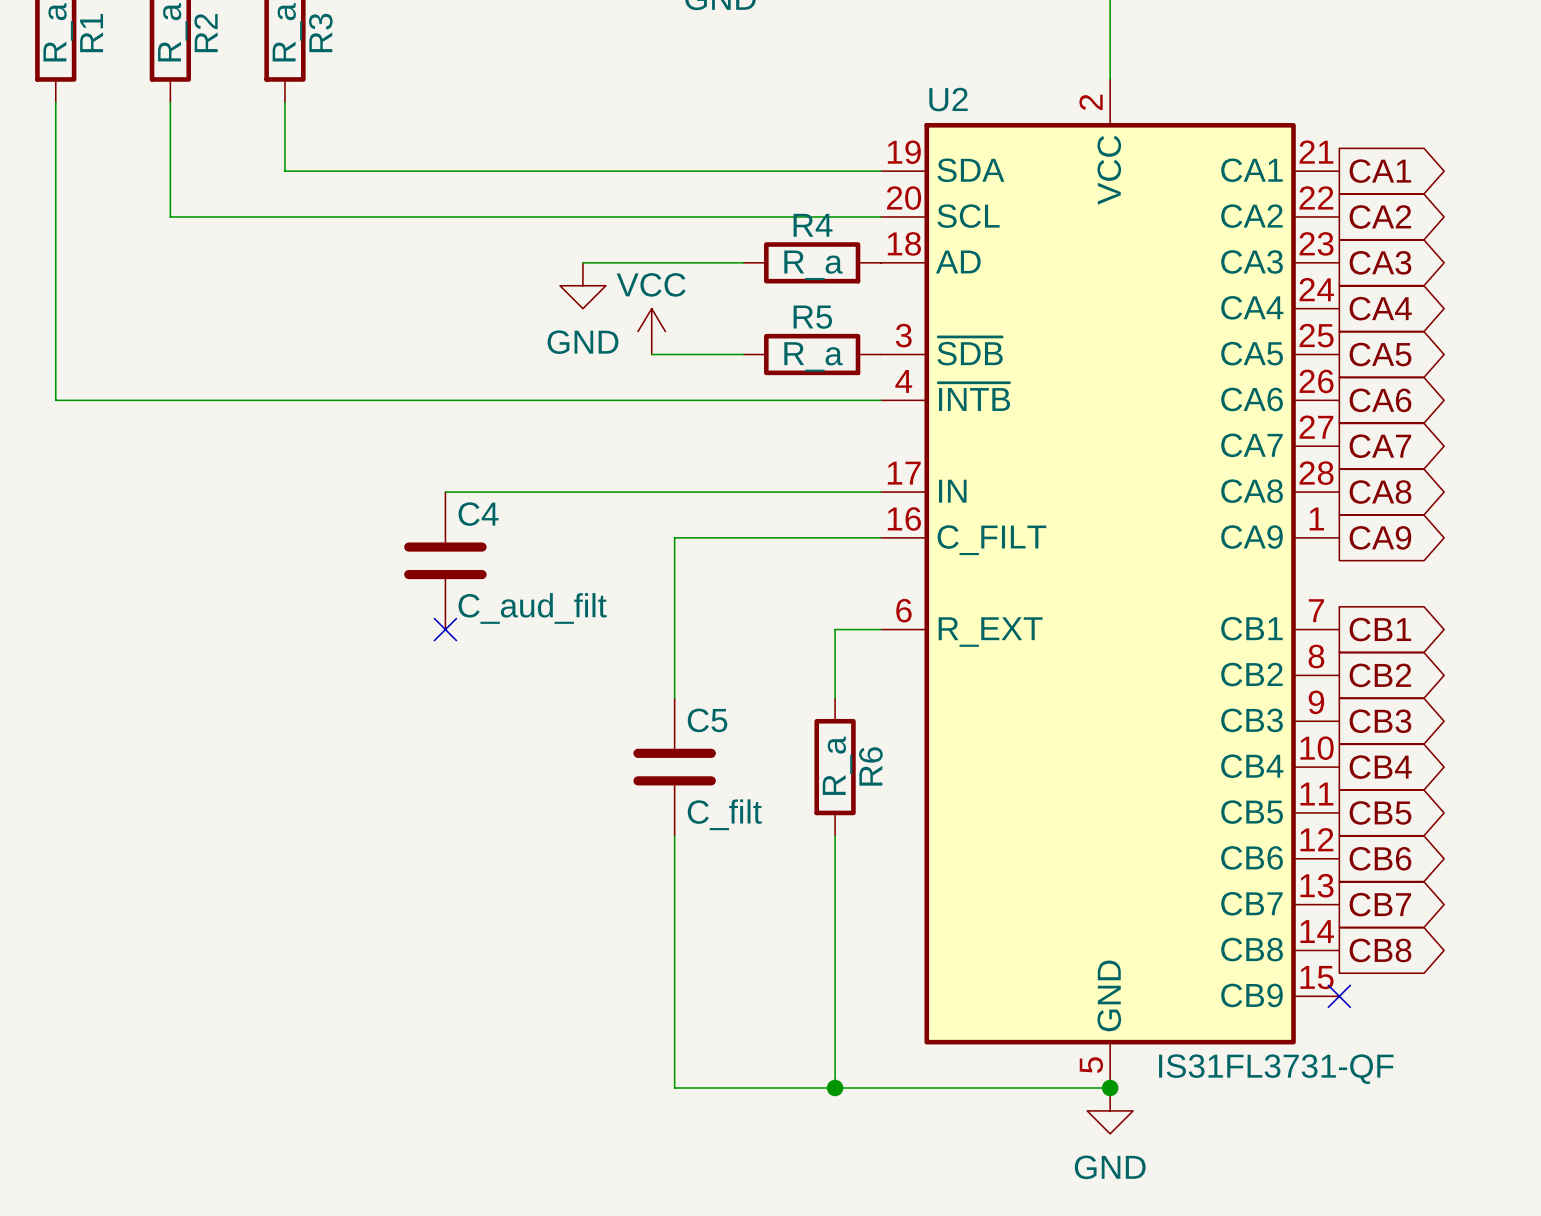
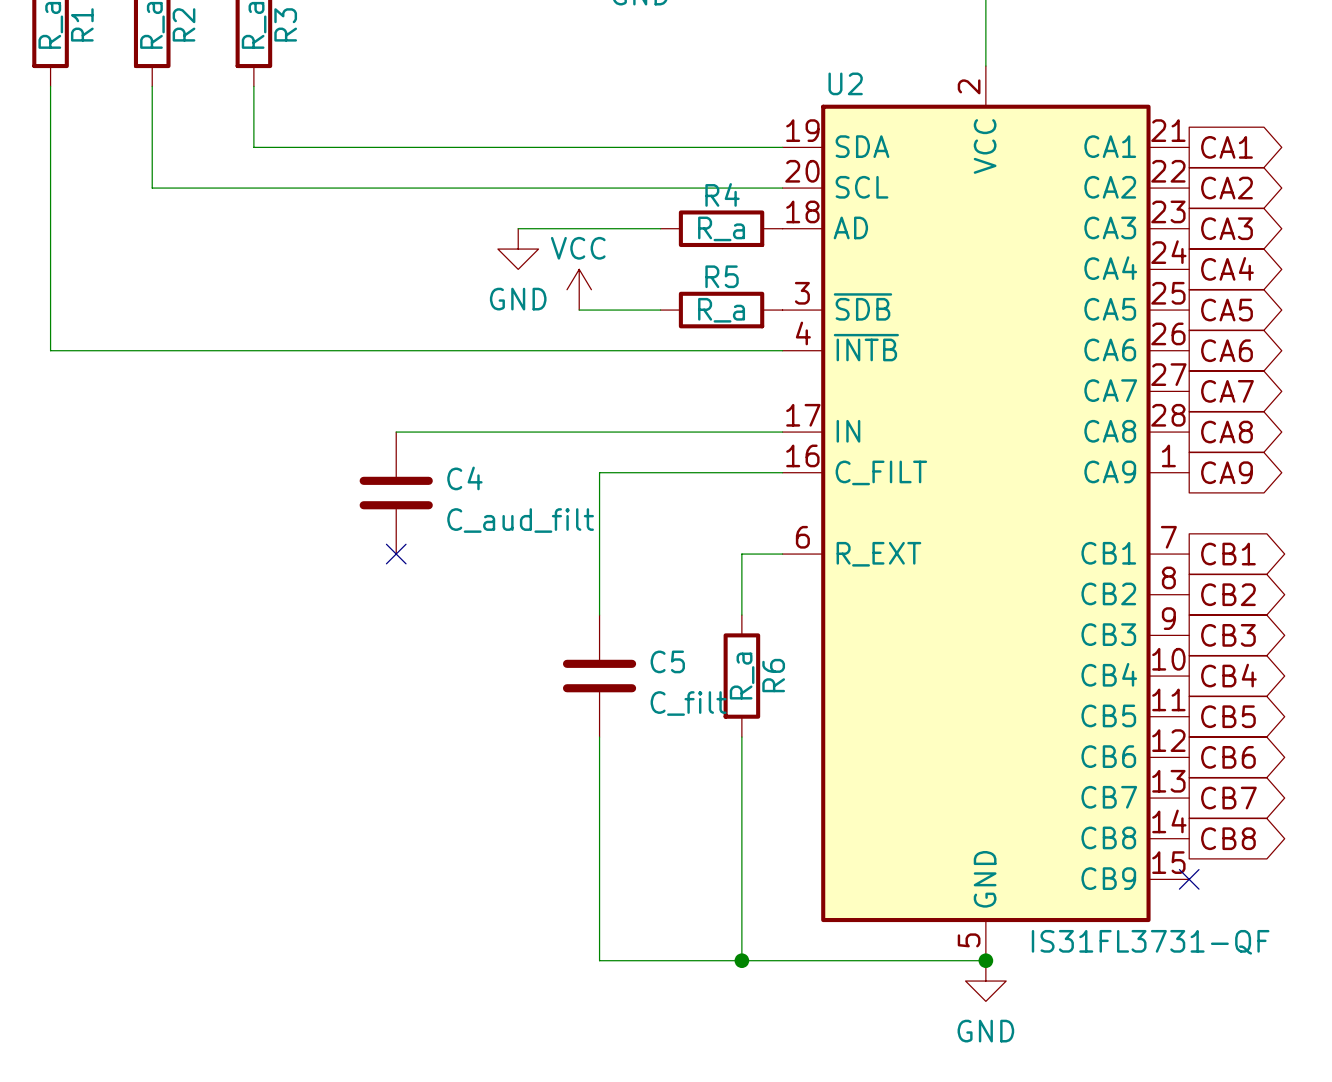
C4 name position: C4 (478, 514) -> C4 (464, 478)
C4 value position: C_aud_filt (532, 608) -> C_aud_filt (520, 520)
C5 name position: C5 (707, 720) -> C5 (667, 661)
C5 value position: C_filt (724, 814) -> C_filt (688, 703)

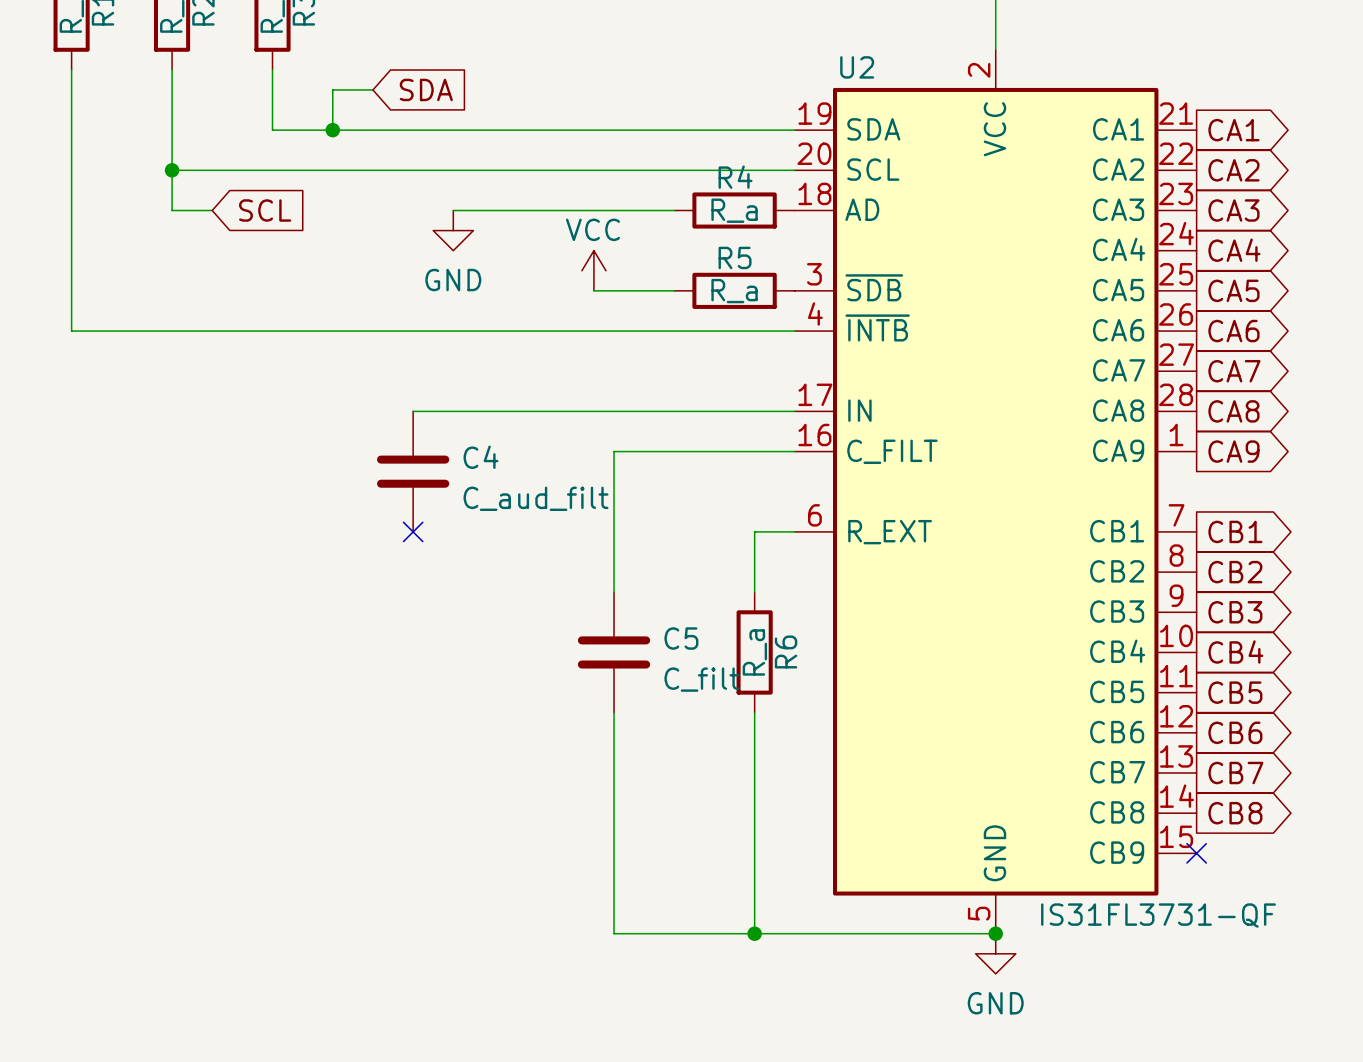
wire: none -> (372, 89) (332, 89) (332, 130)
global label: none -> SDA (426, 89)
junction: none -> (332, 130)
wire: none -> (172, 170) (172, 210) (212, 210)
junction: none -> (172, 170)
global label: none -> SCL (265, 210)
wire: none -> (453, 210) (533, 210)
power symbol position: GND (518, 249) -> GND (453, 230)

